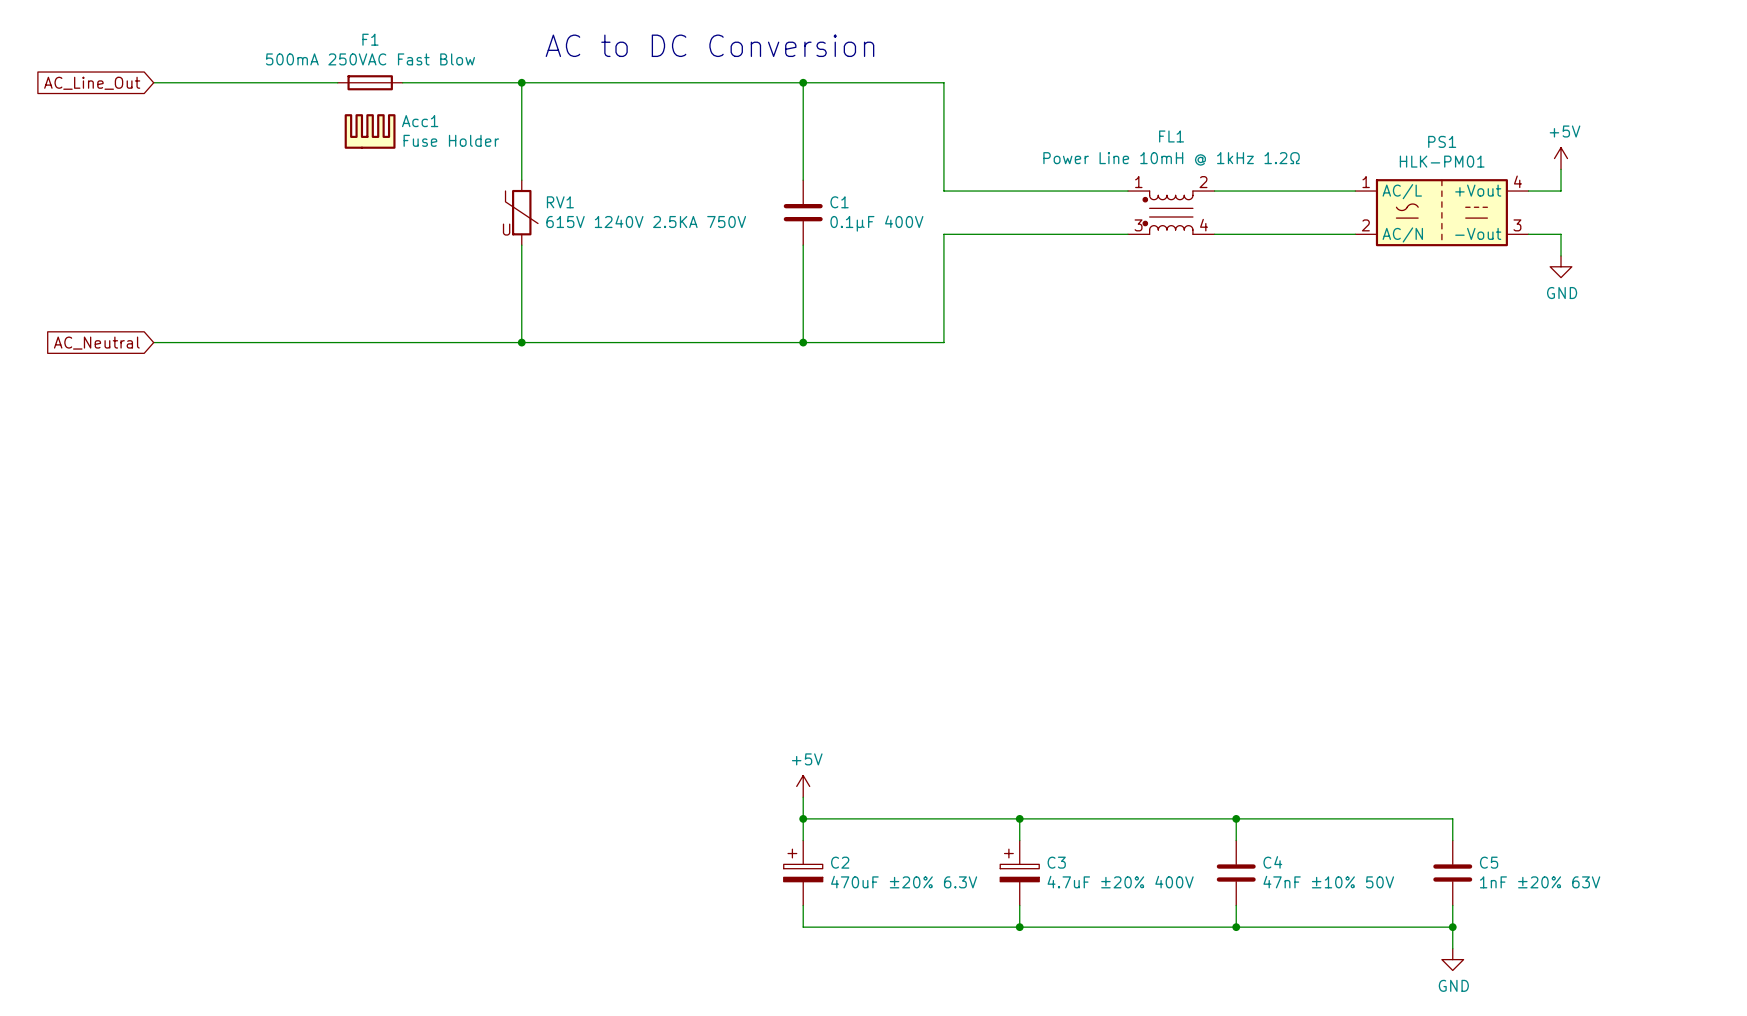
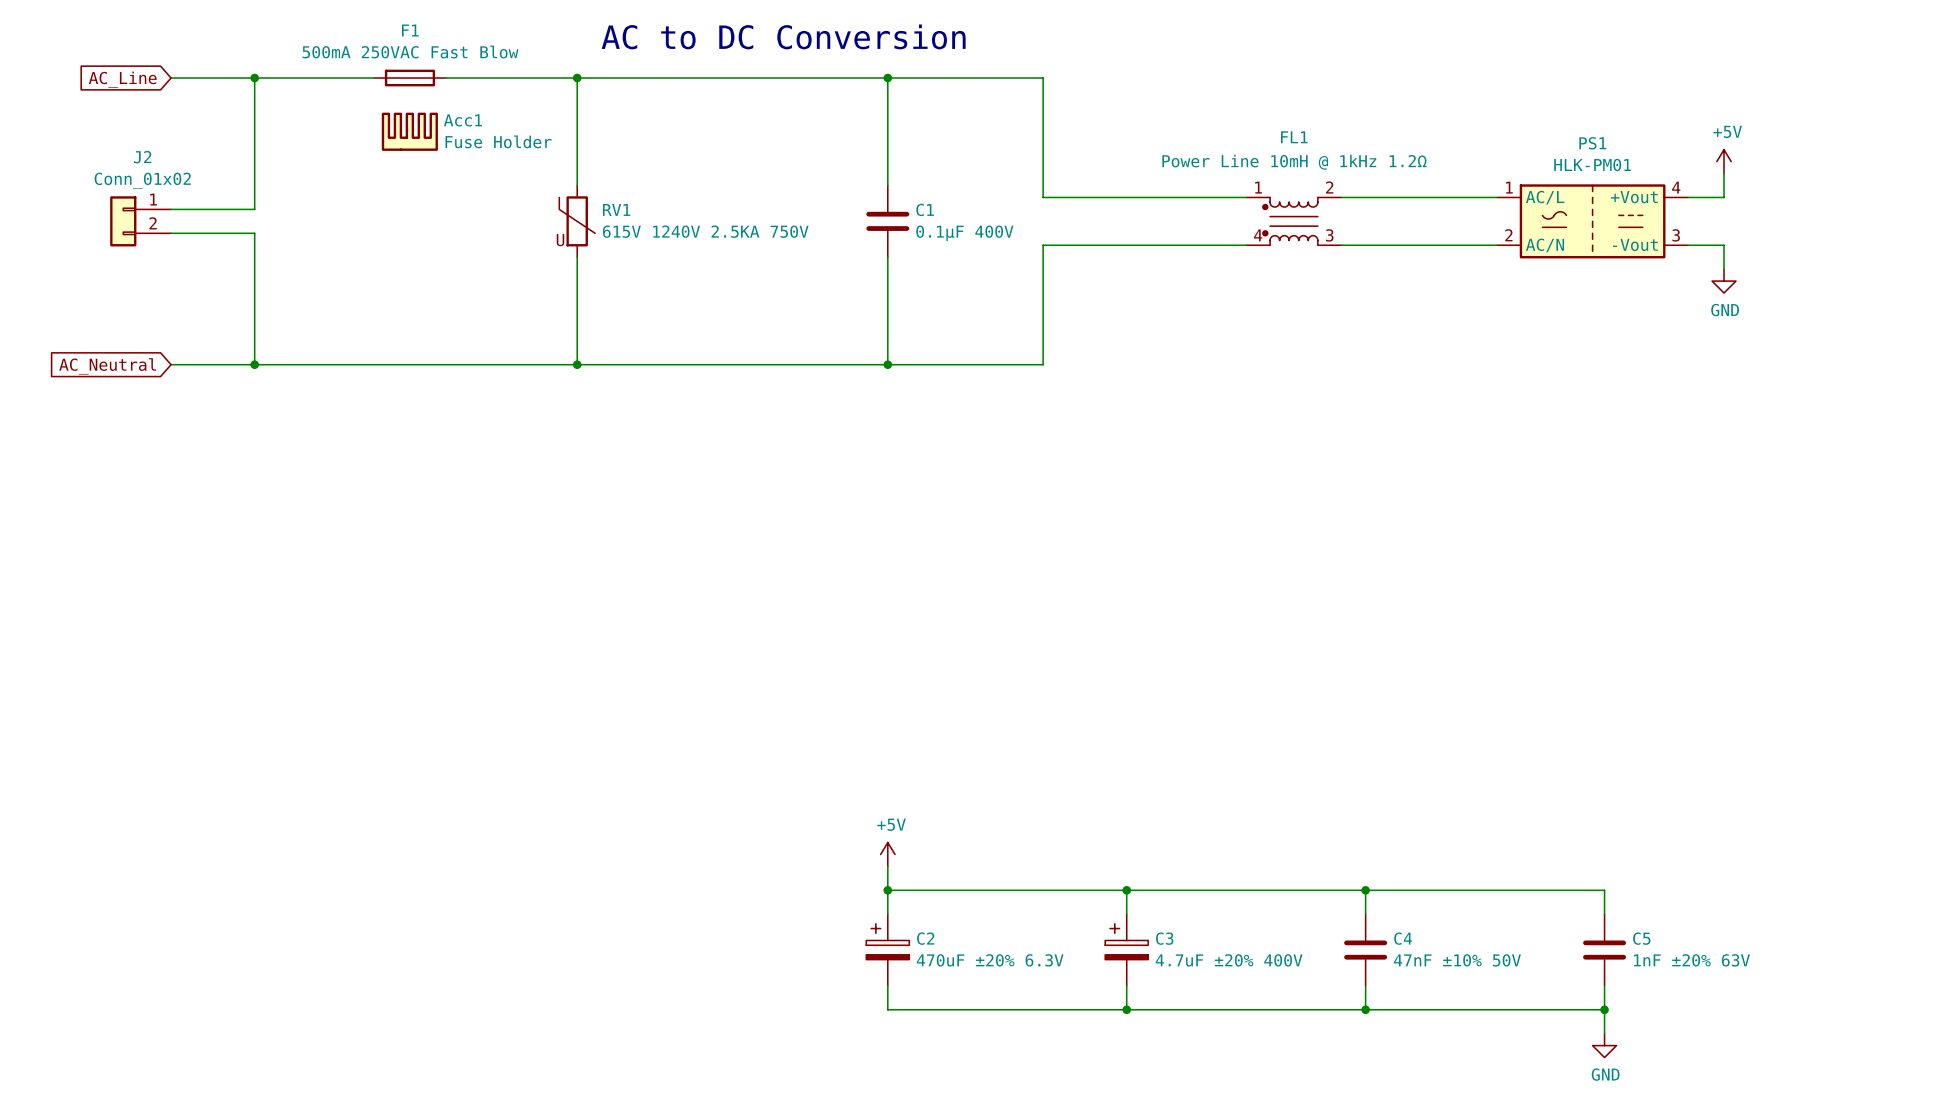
wire: none -> (254, 78) (254, 209) (171, 209)
junction: none -> (254, 78)
global label: AC_Line_Out (92, 83) -> AC_Line (122, 79)
J2: none -> Conn_01x02 (140, 221)
wire: none -> (171, 233) (254, 233) (254, 364)
FL1 pin number: 3 (1138, 225) -> 4 (1258, 235)
FL1 pin number: 4 (1204, 225) -> 3 (1329, 235)
junction: none -> (254, 364)

